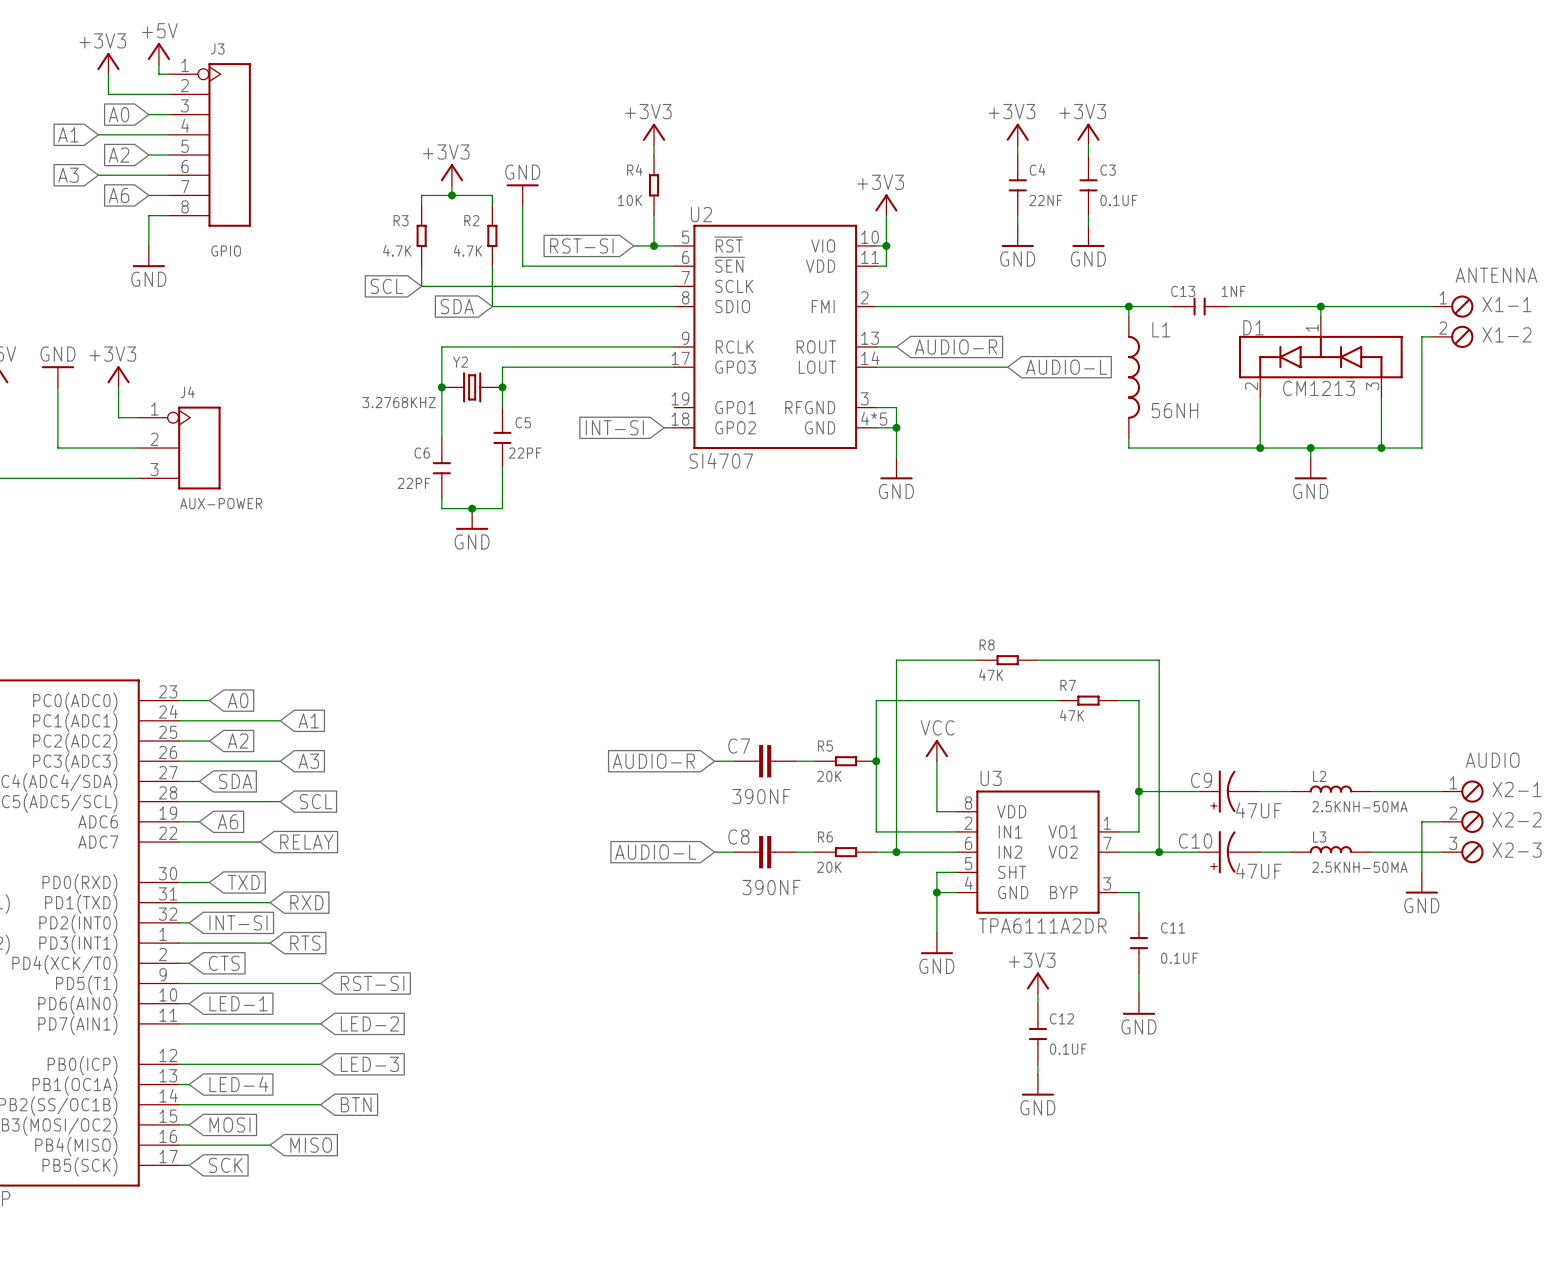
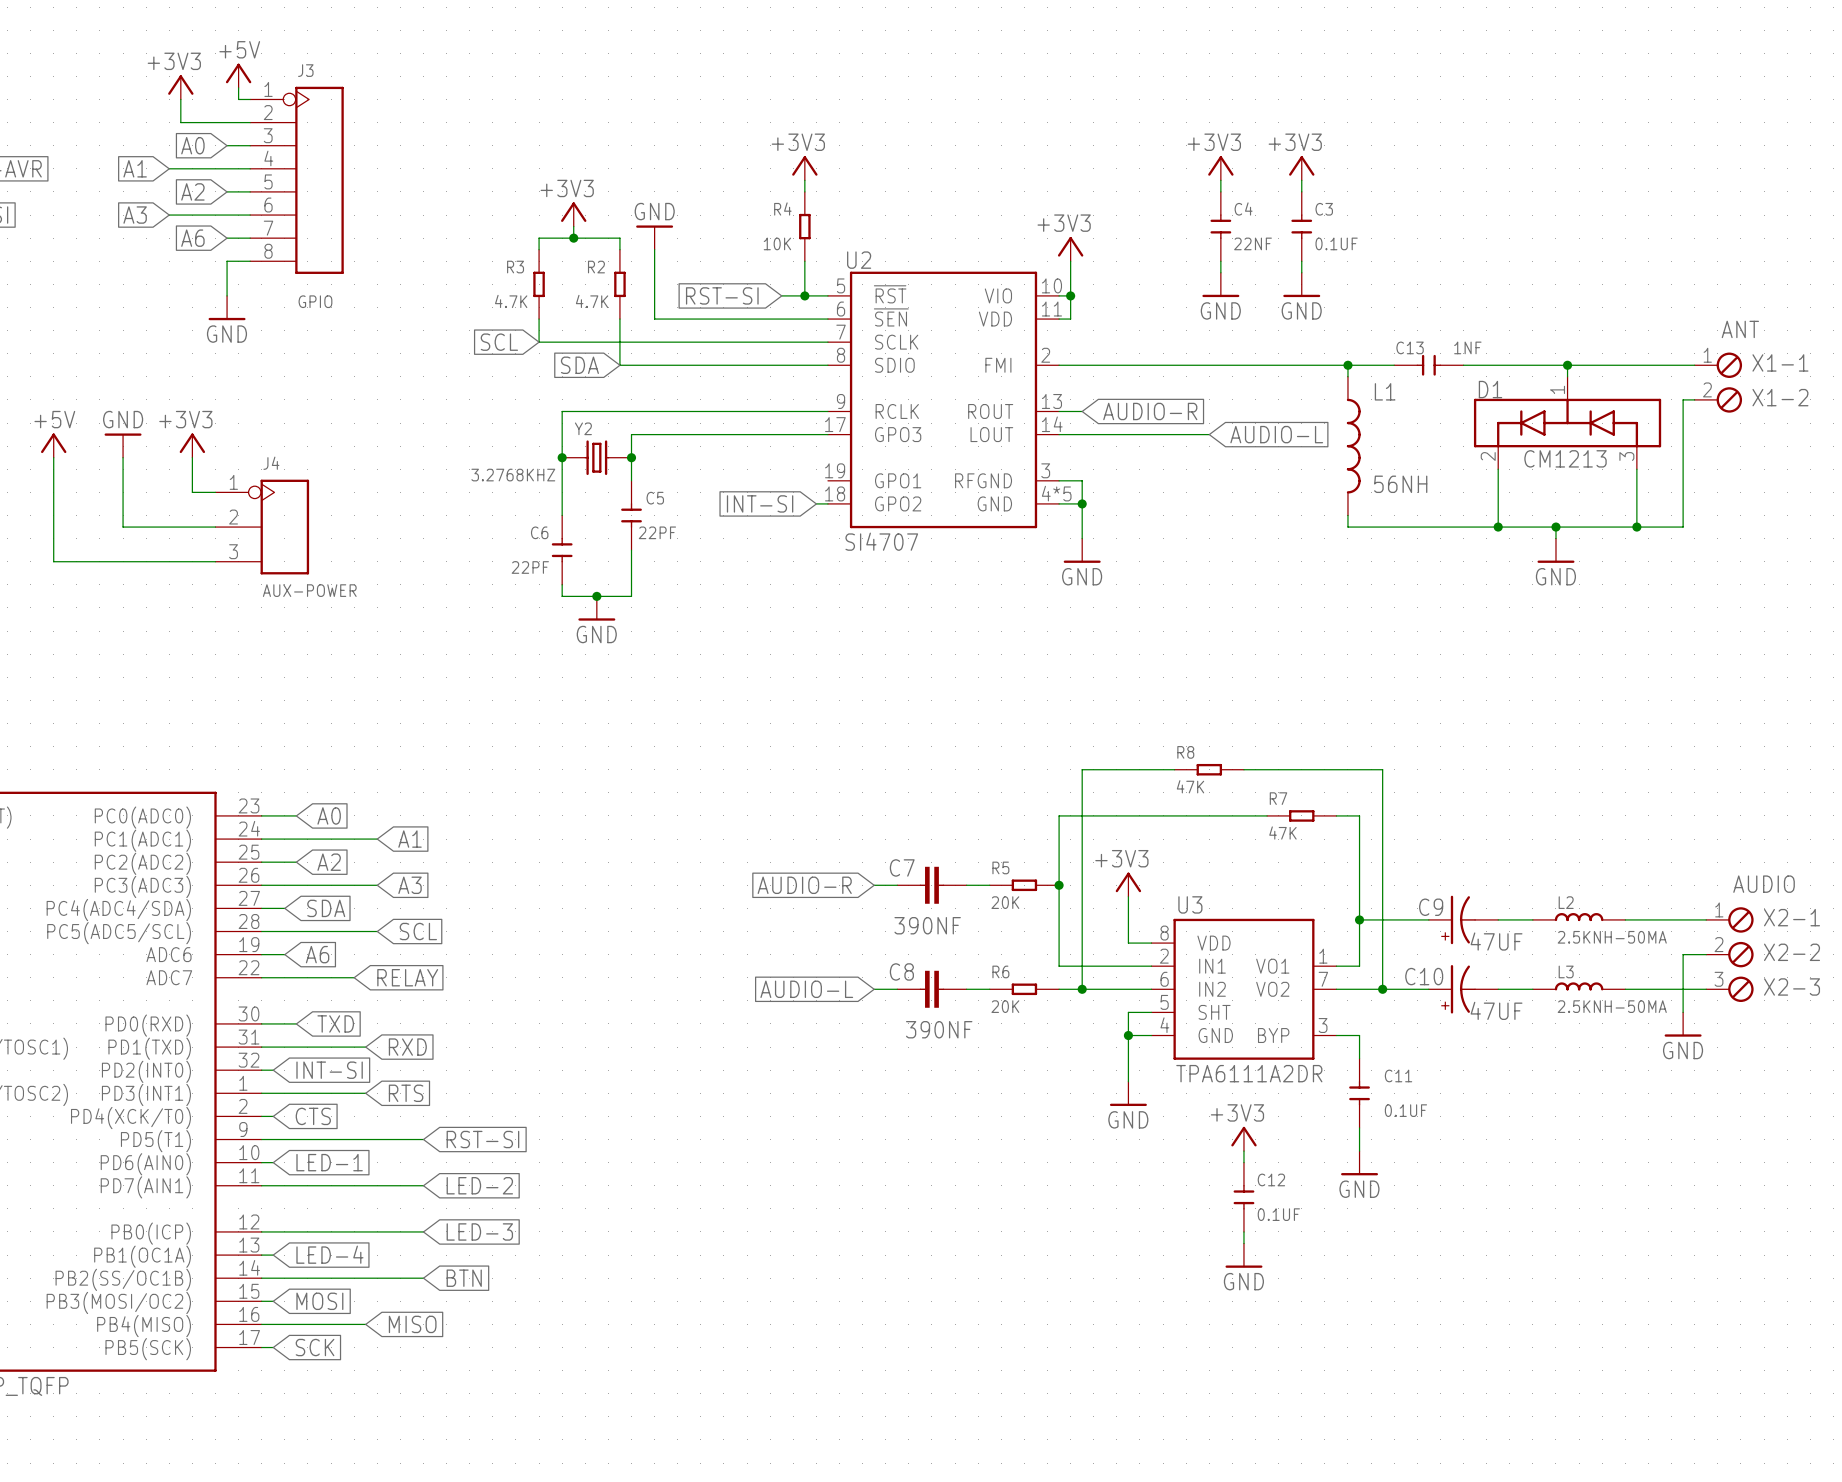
X1-2 value: ANTENNA (1496, 275) -> ANT (1740, 329)
power symbol: VCC (936, 750) -> none
power symbol: none -> +3V3 (1128, 884)

